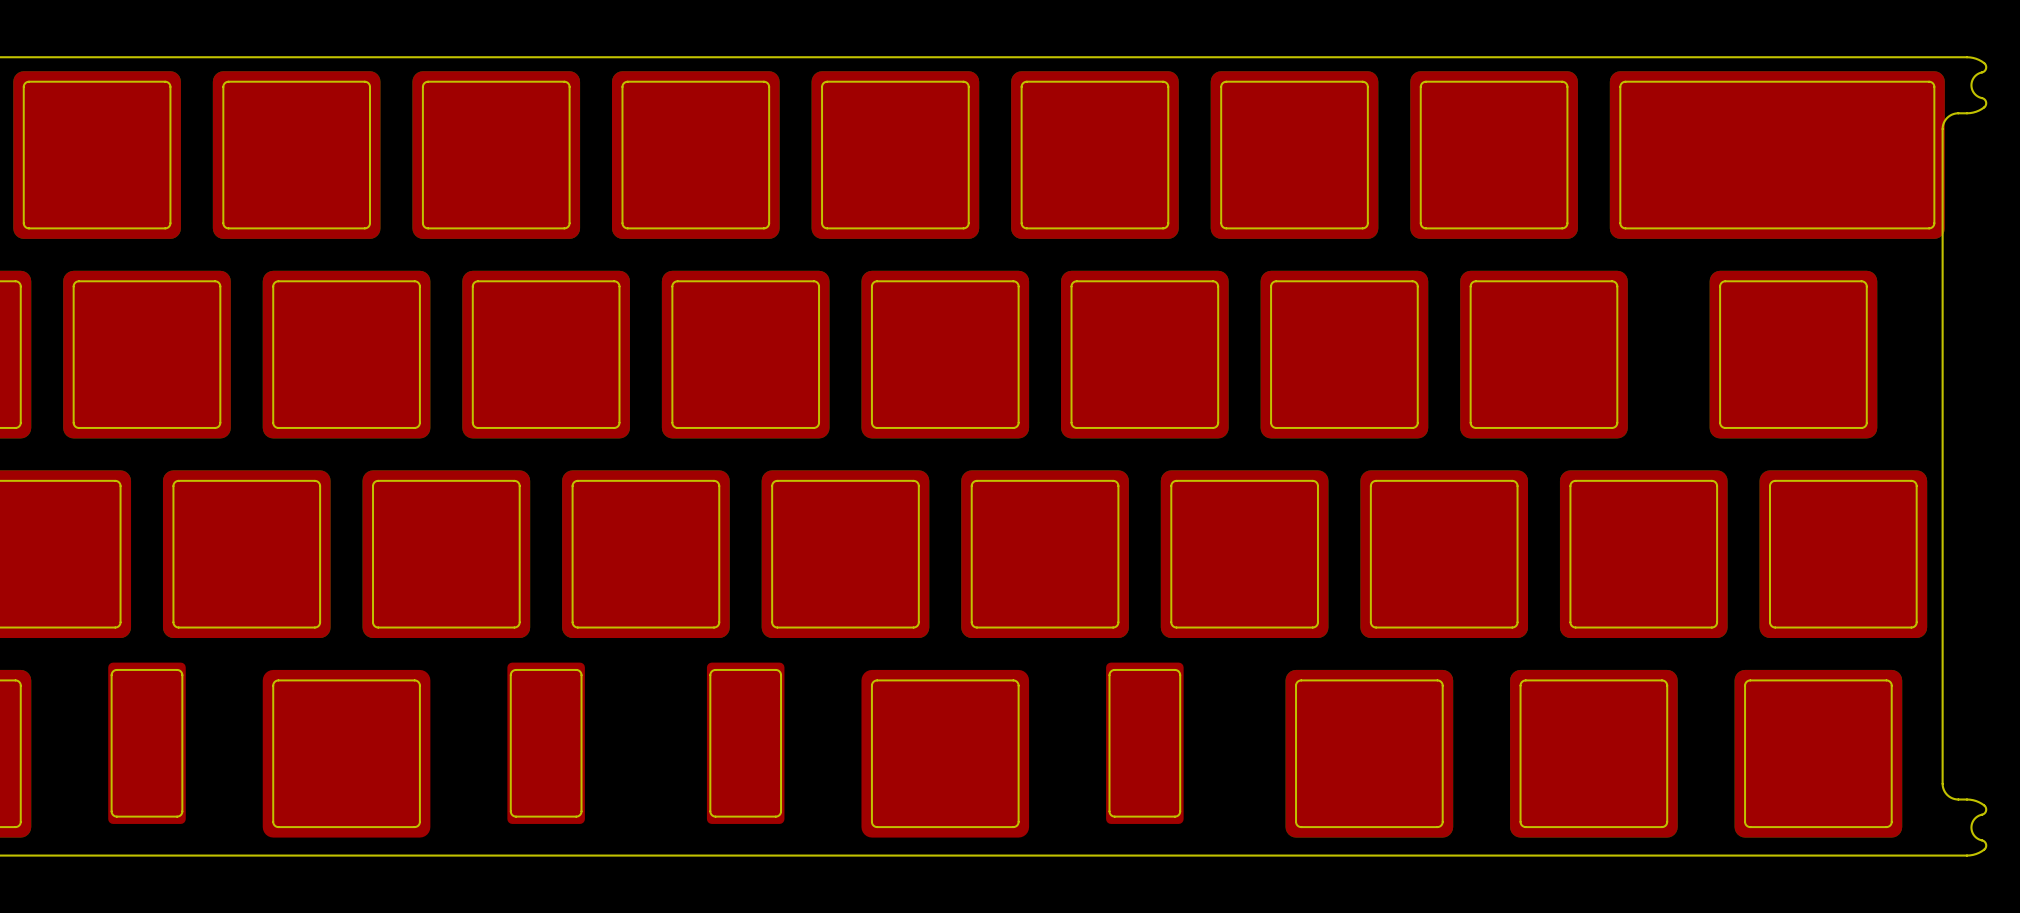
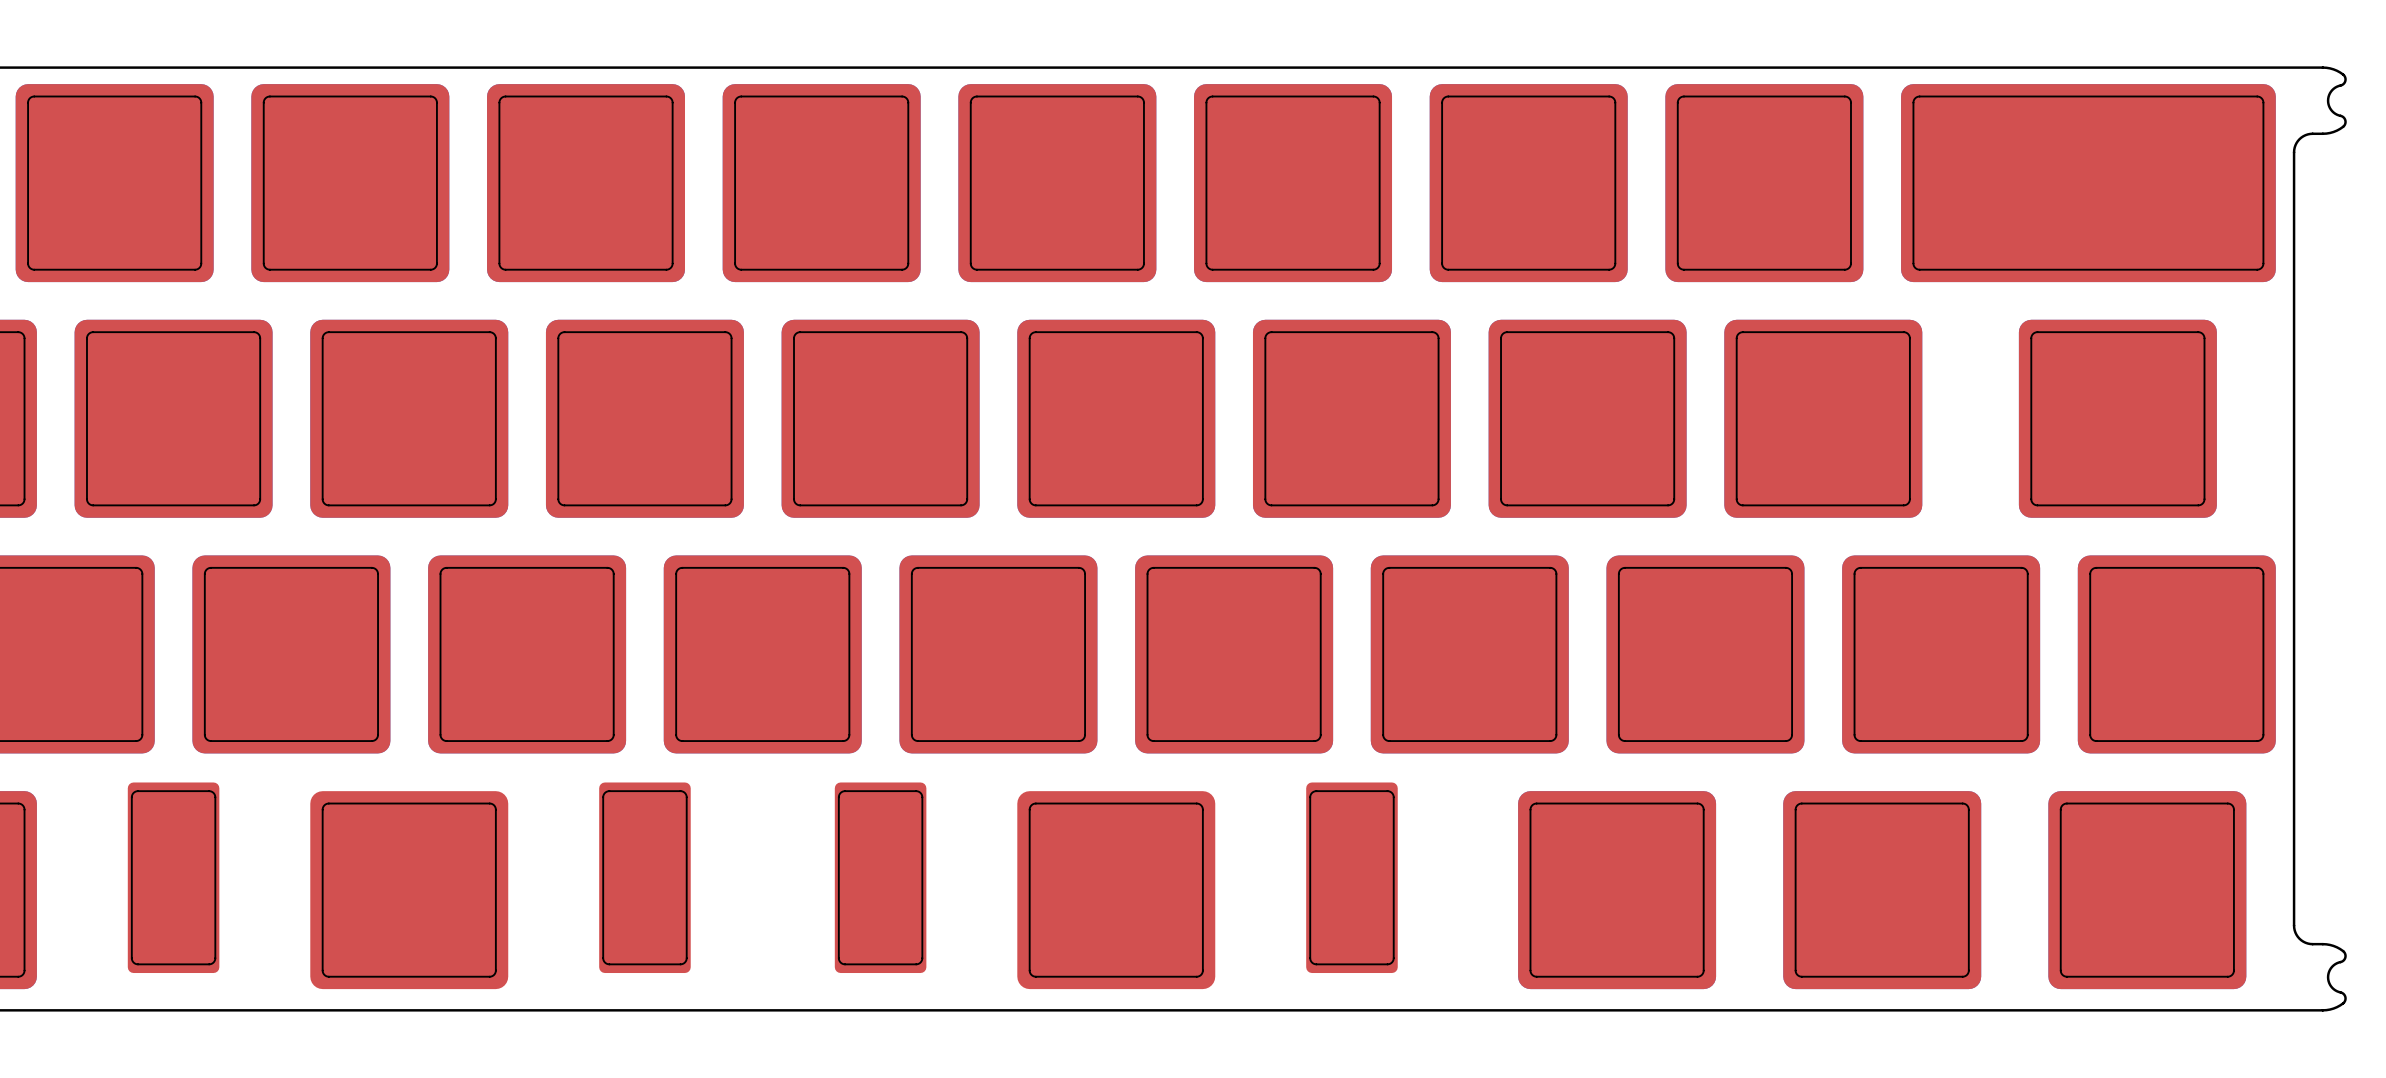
part footprint: [1609, 71, 1945, 239] -> [1901, 84, 2276, 283]

